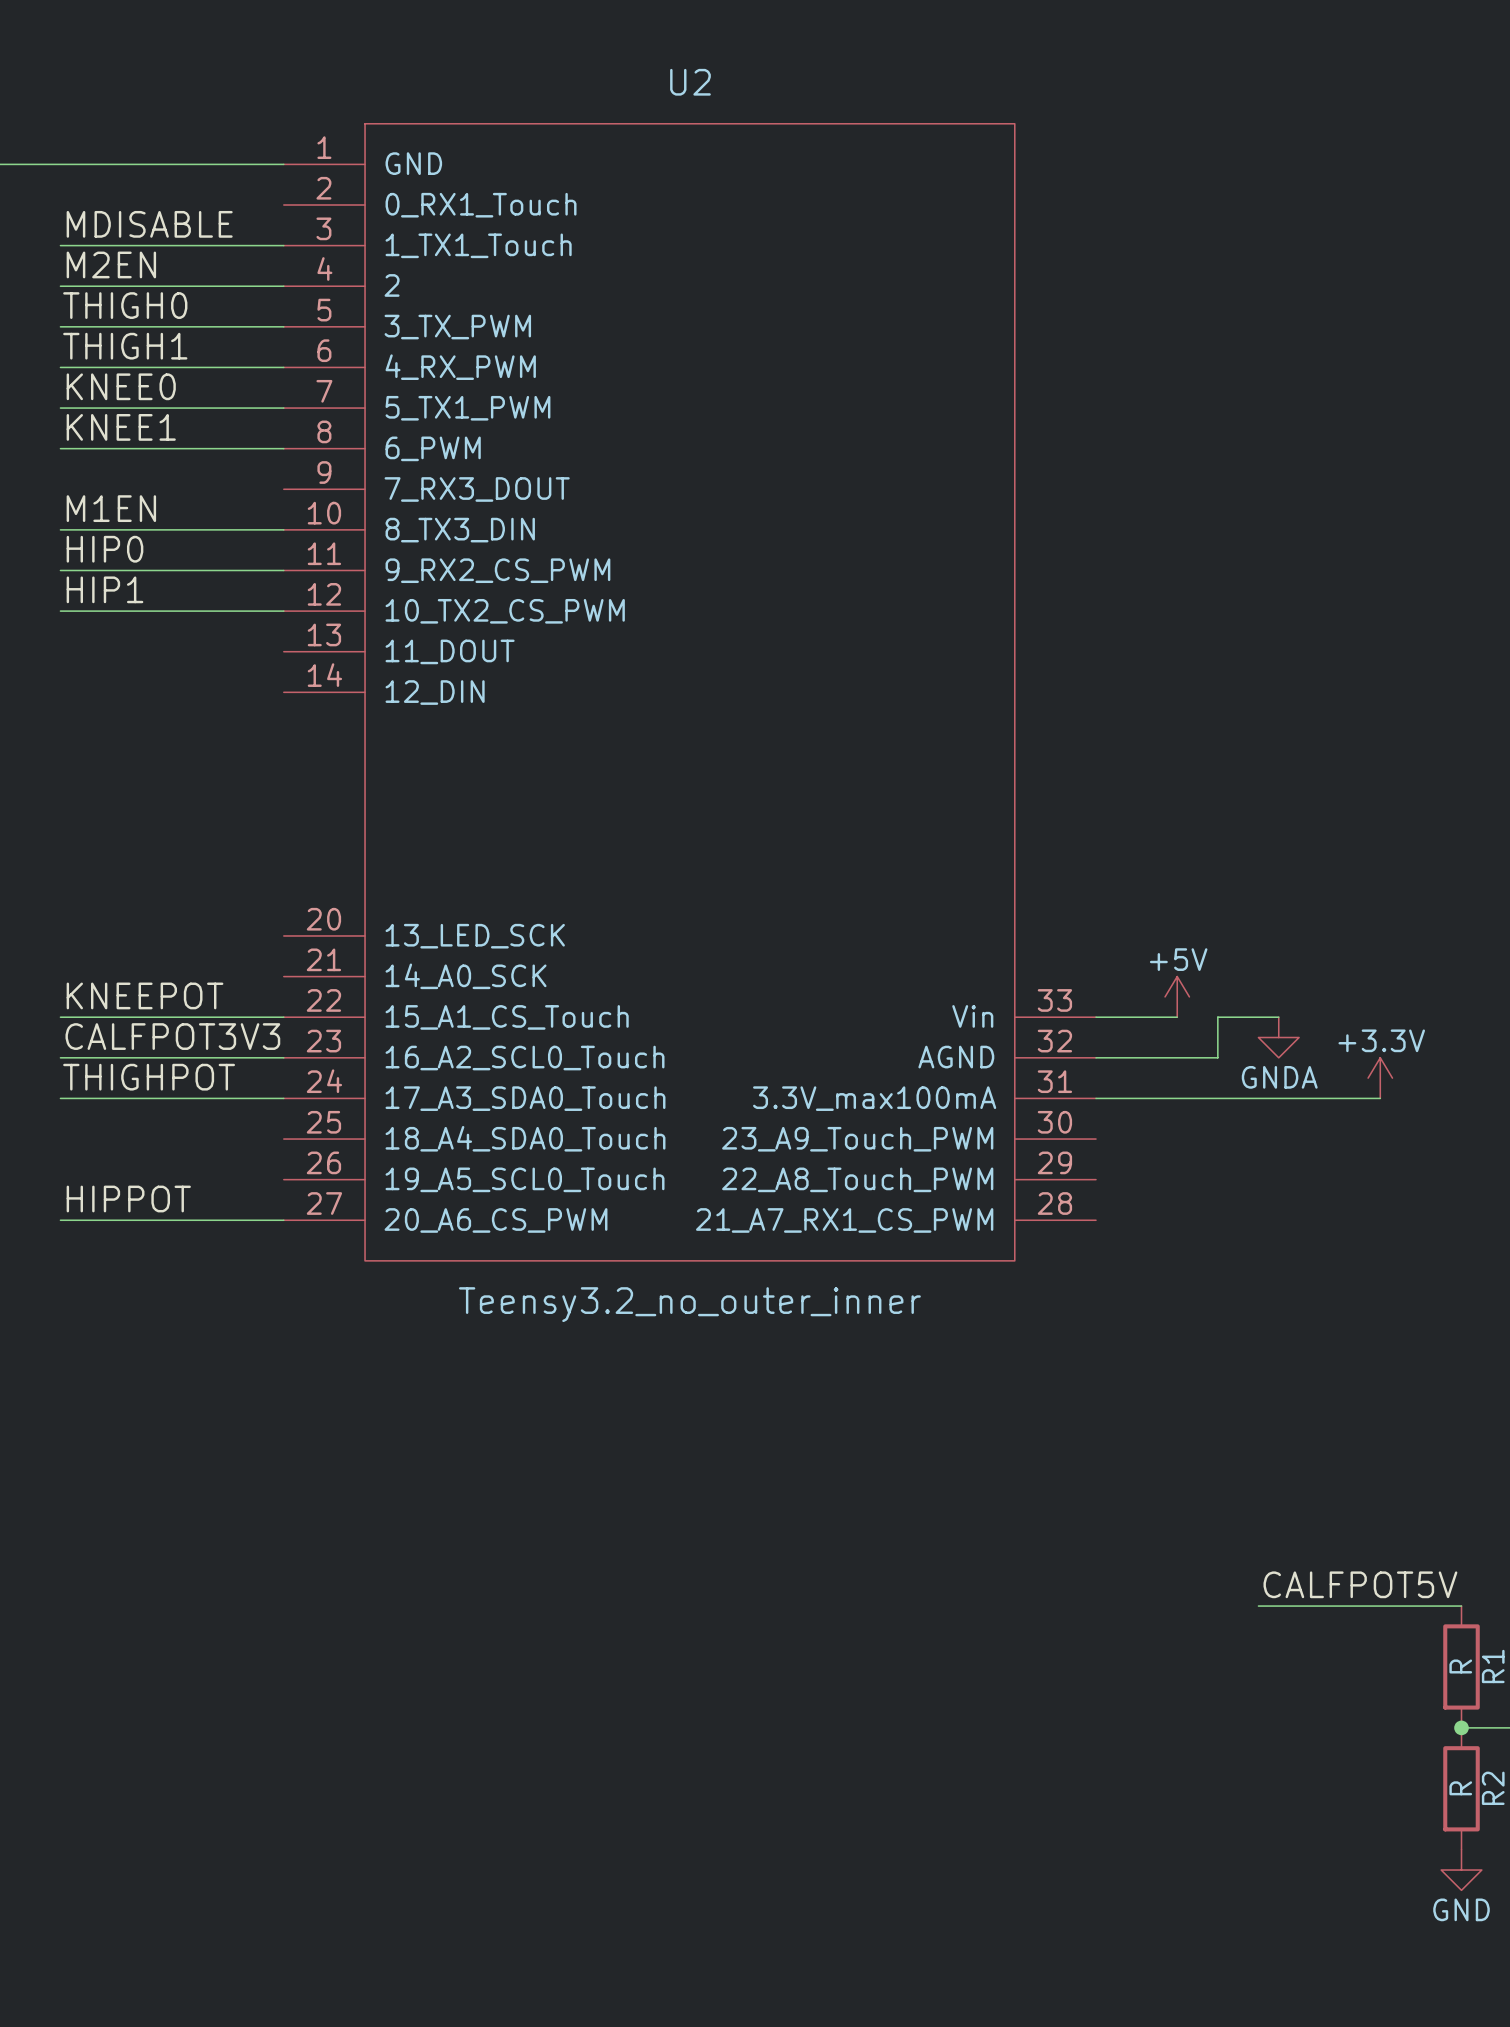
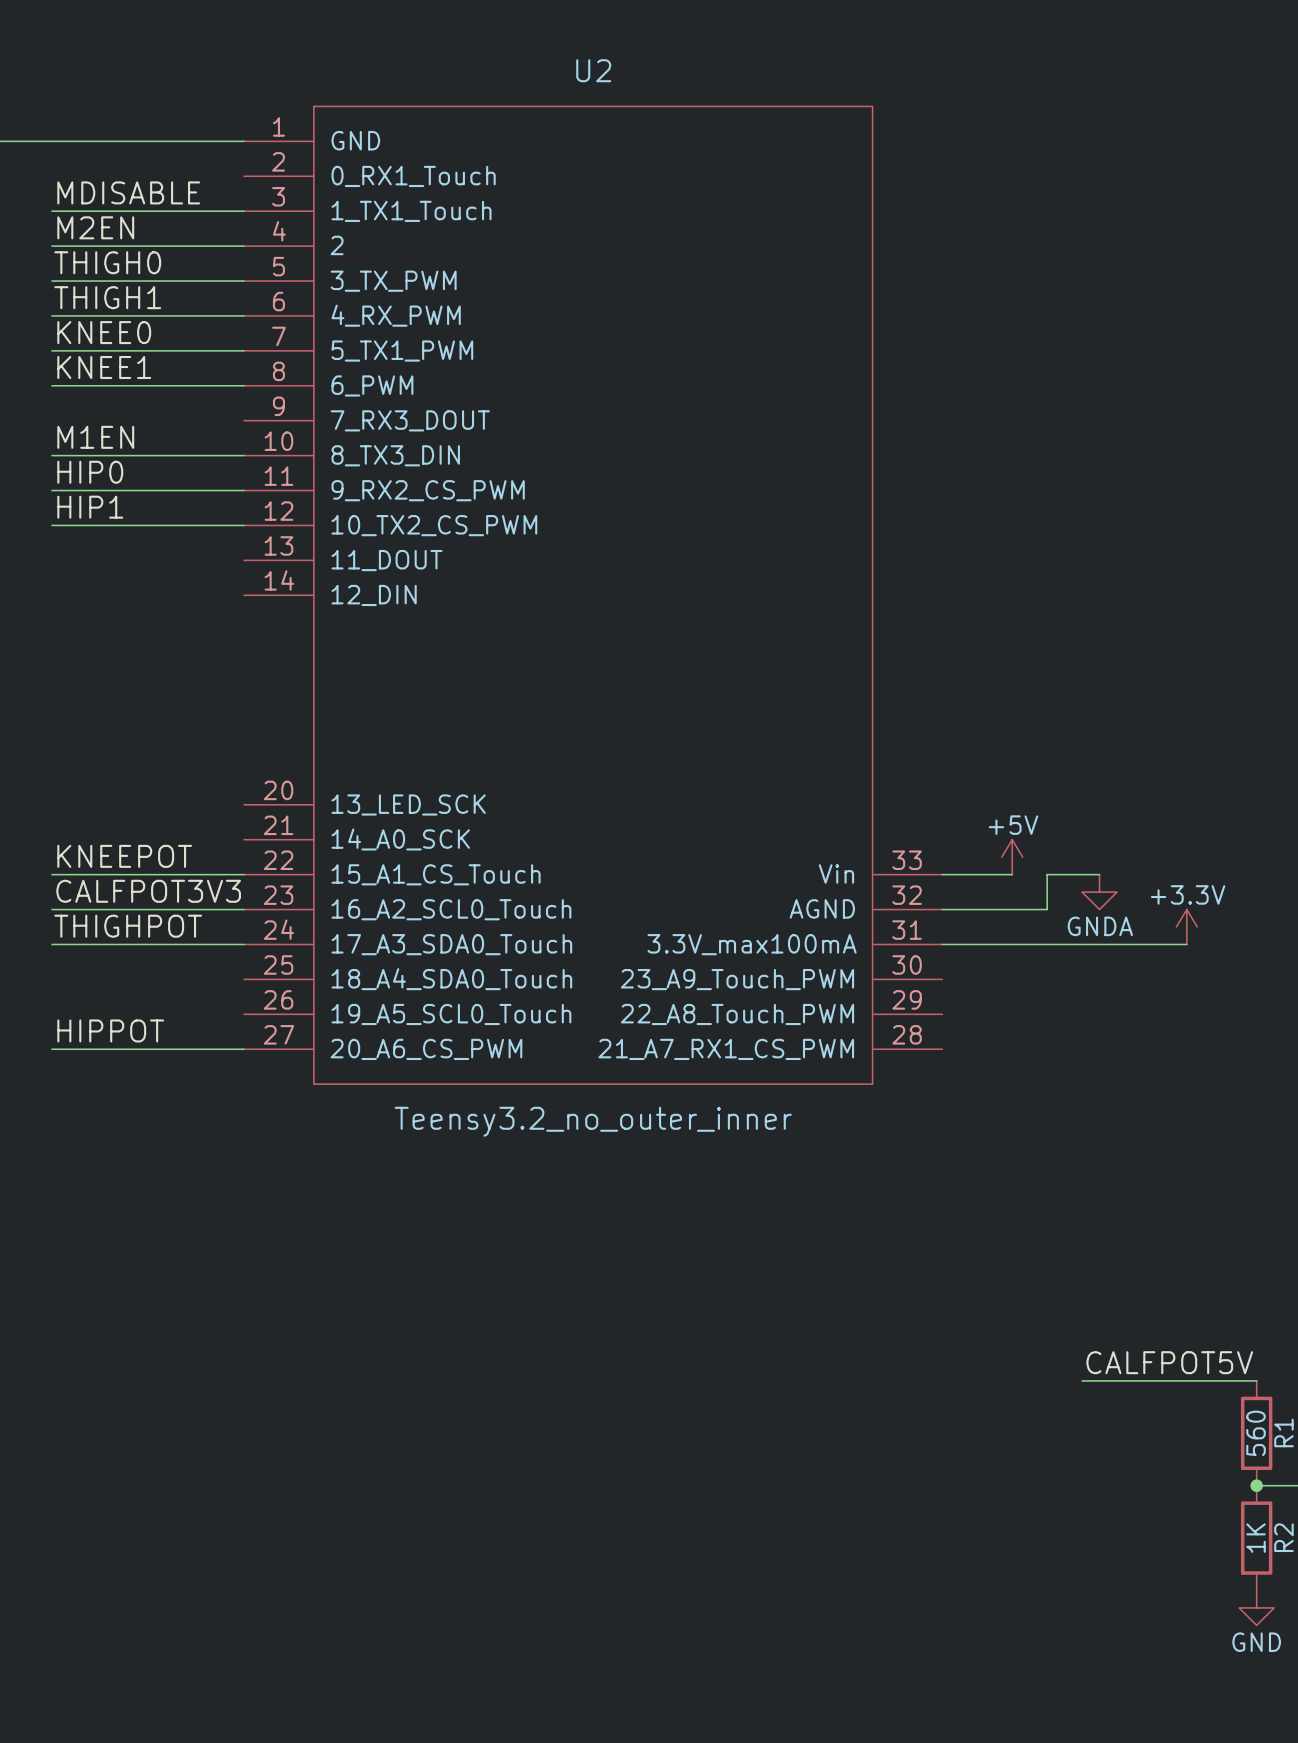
R1 value: R (1460, 1666) -> 560 (1256, 1433)
R2 value: R (1460, 1788) -> 1K (1256, 1538)

